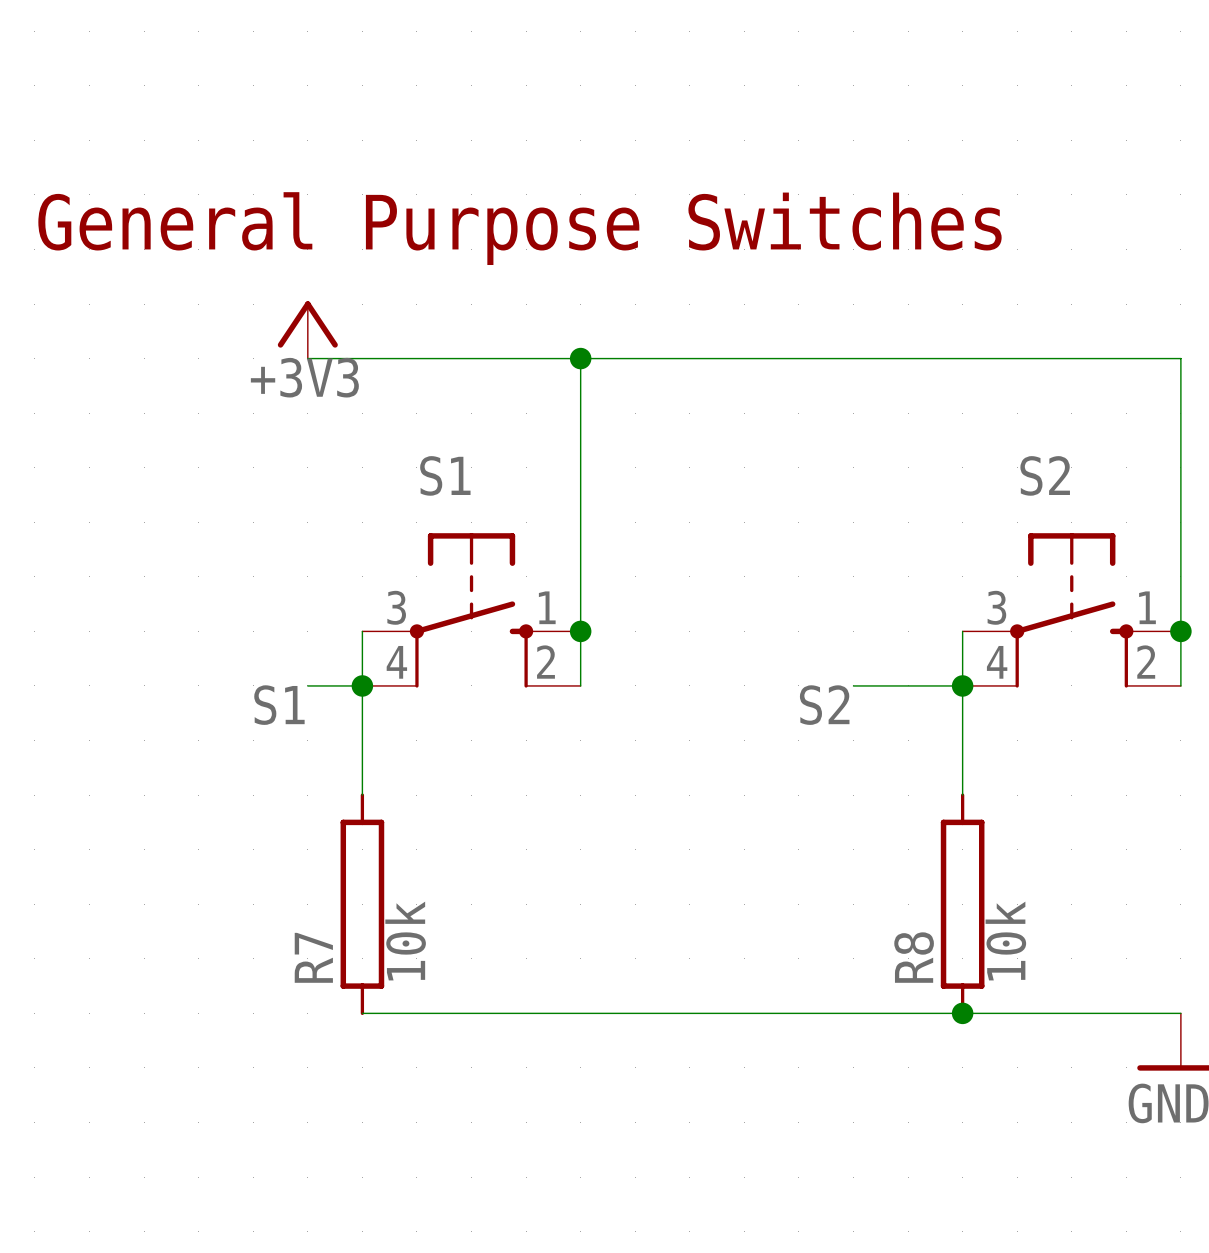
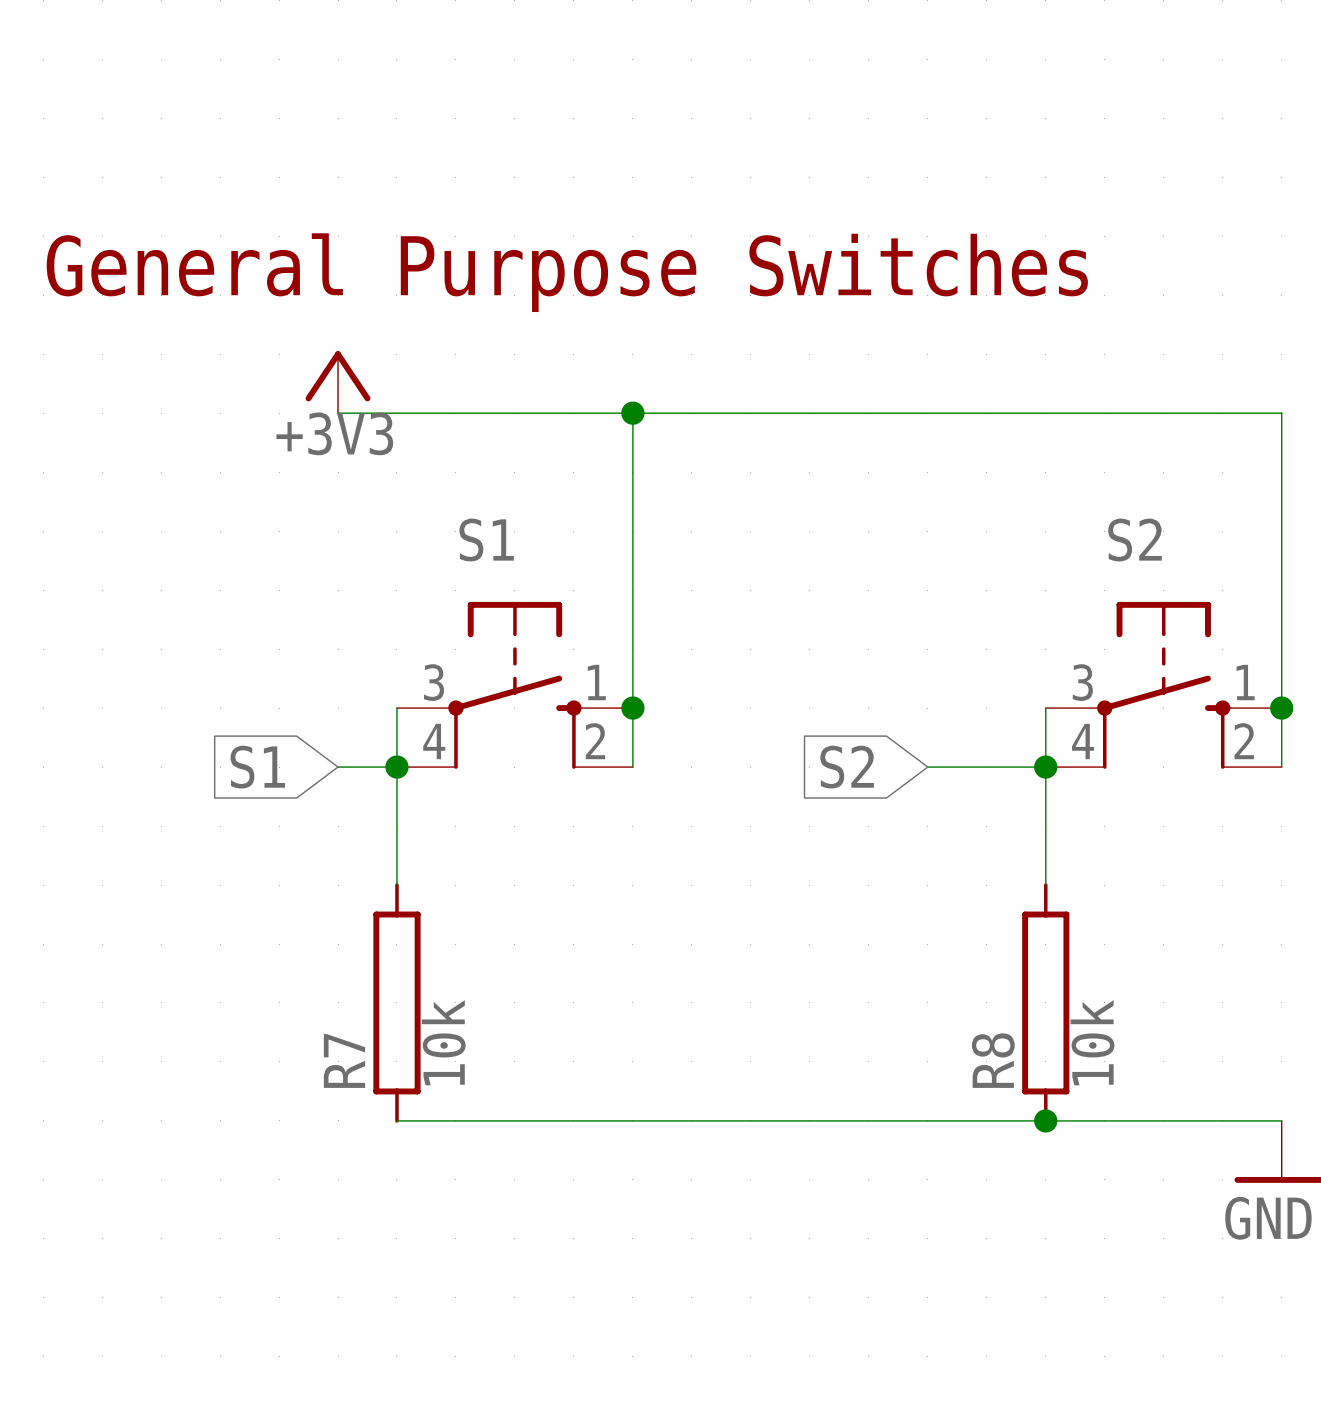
global label: none -> S1 (257, 767)
global label: none -> S2 (847, 767)
label: S1 (279, 705) -> none
label: S2 (824, 705) -> none

